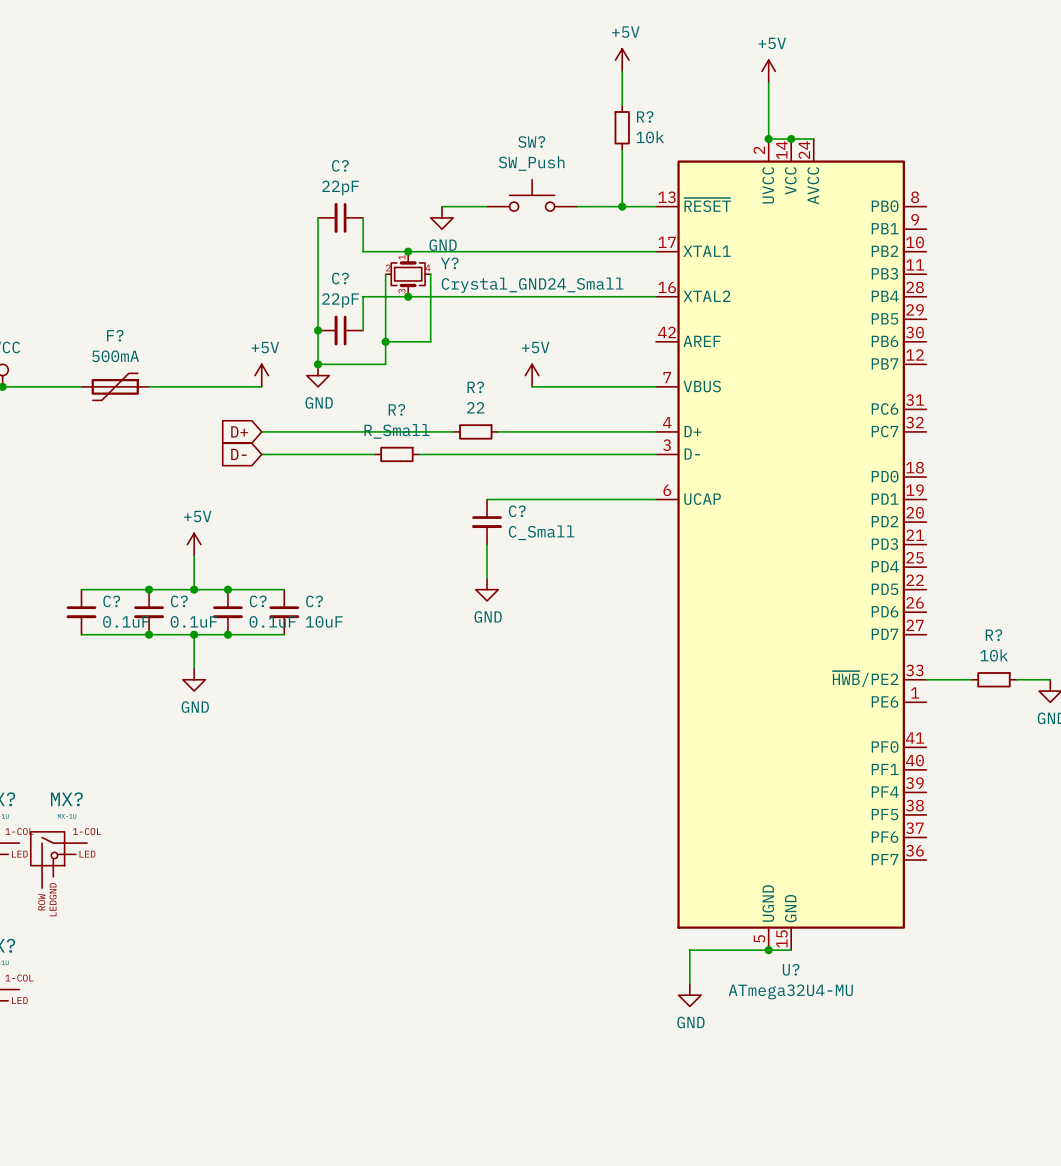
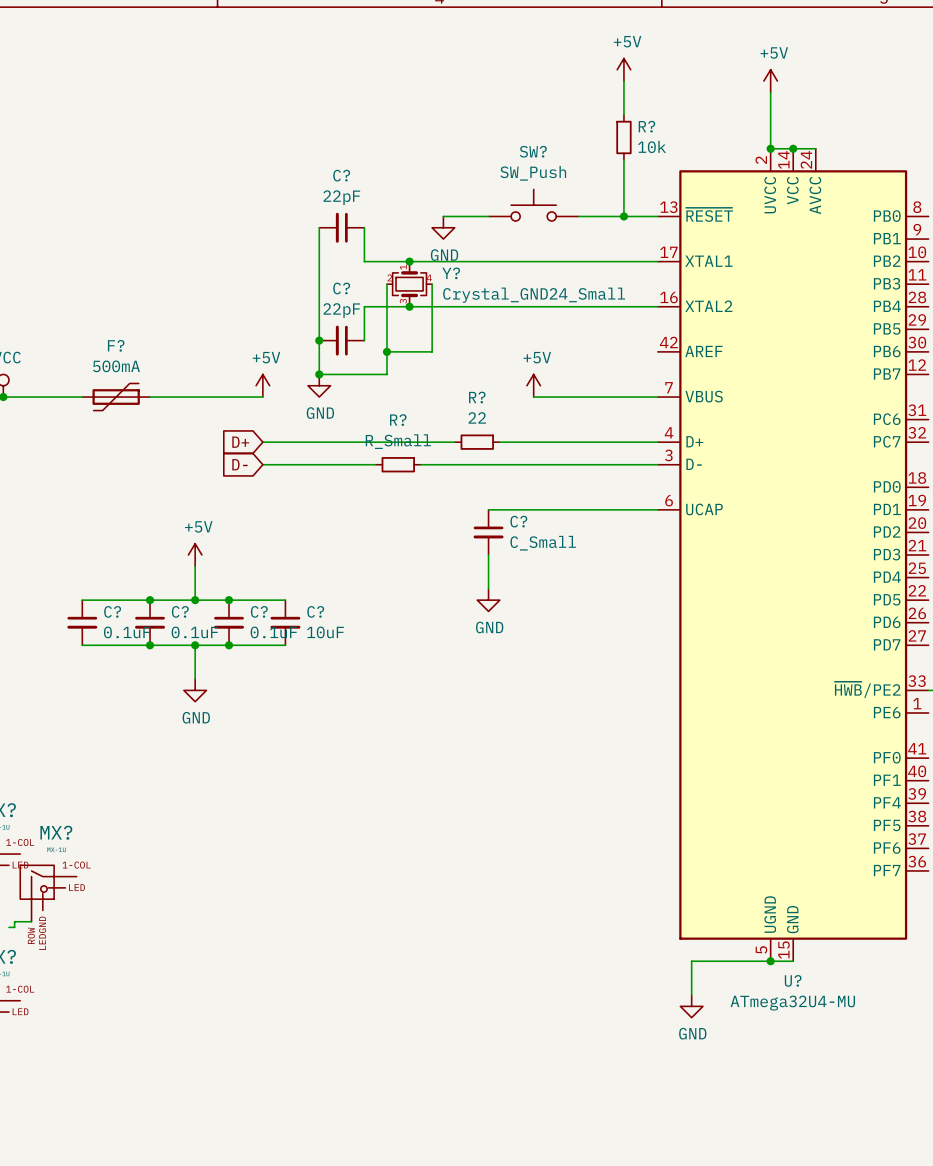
MX? position: (58, 859) -> (48, 893)
wire: none -> (31, 921) (14, 921) (14, 927) (8, 927)

